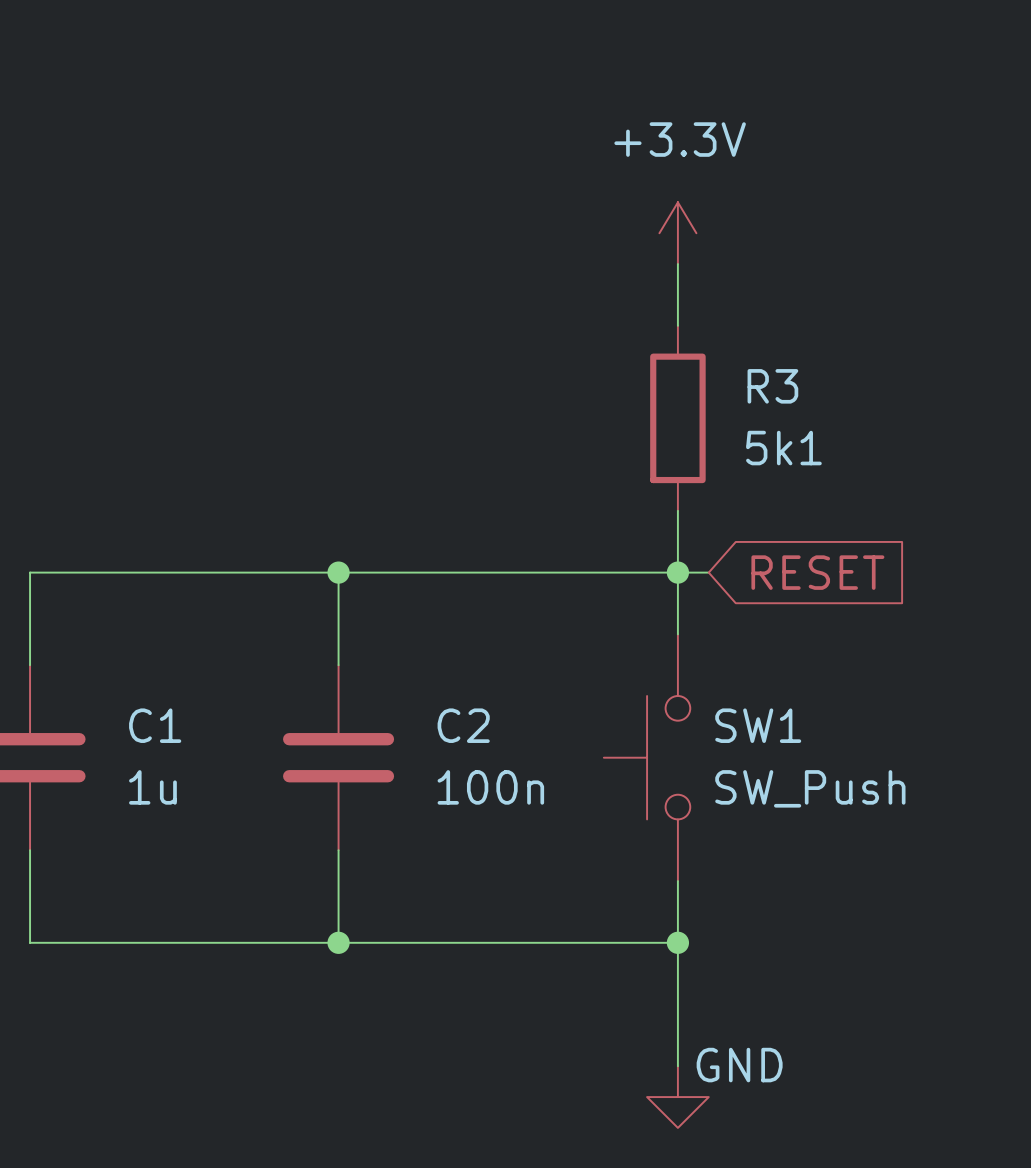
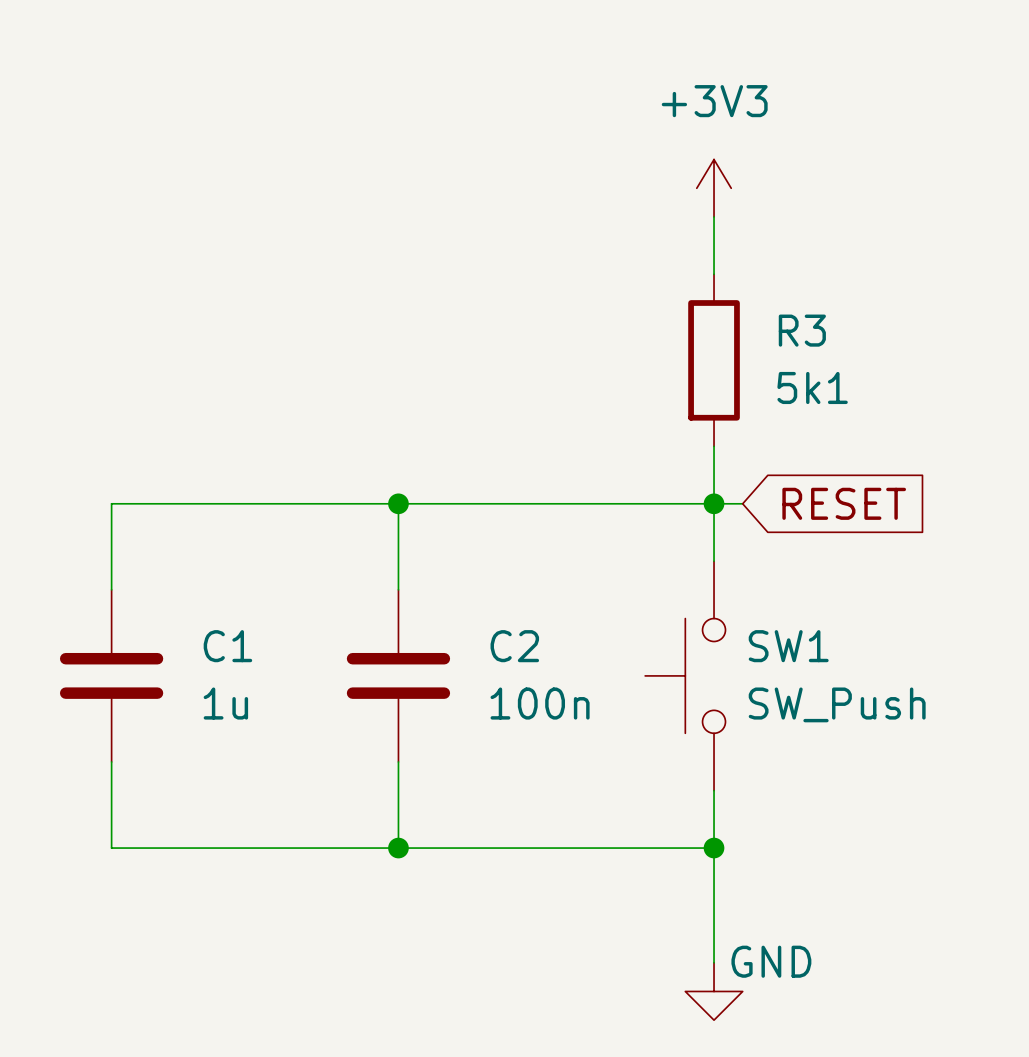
power symbol: +3.3V (677, 233) -> +3V3 (714, 188)

